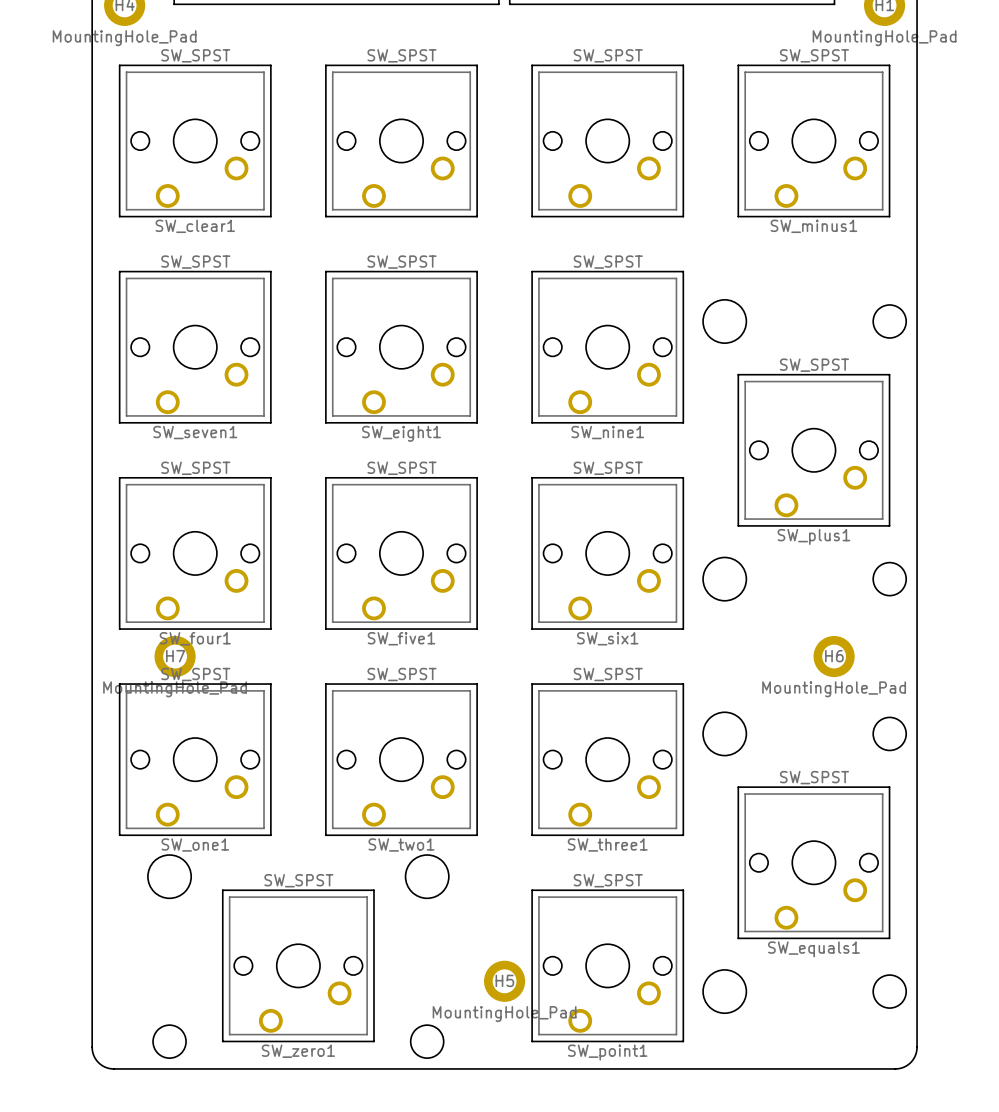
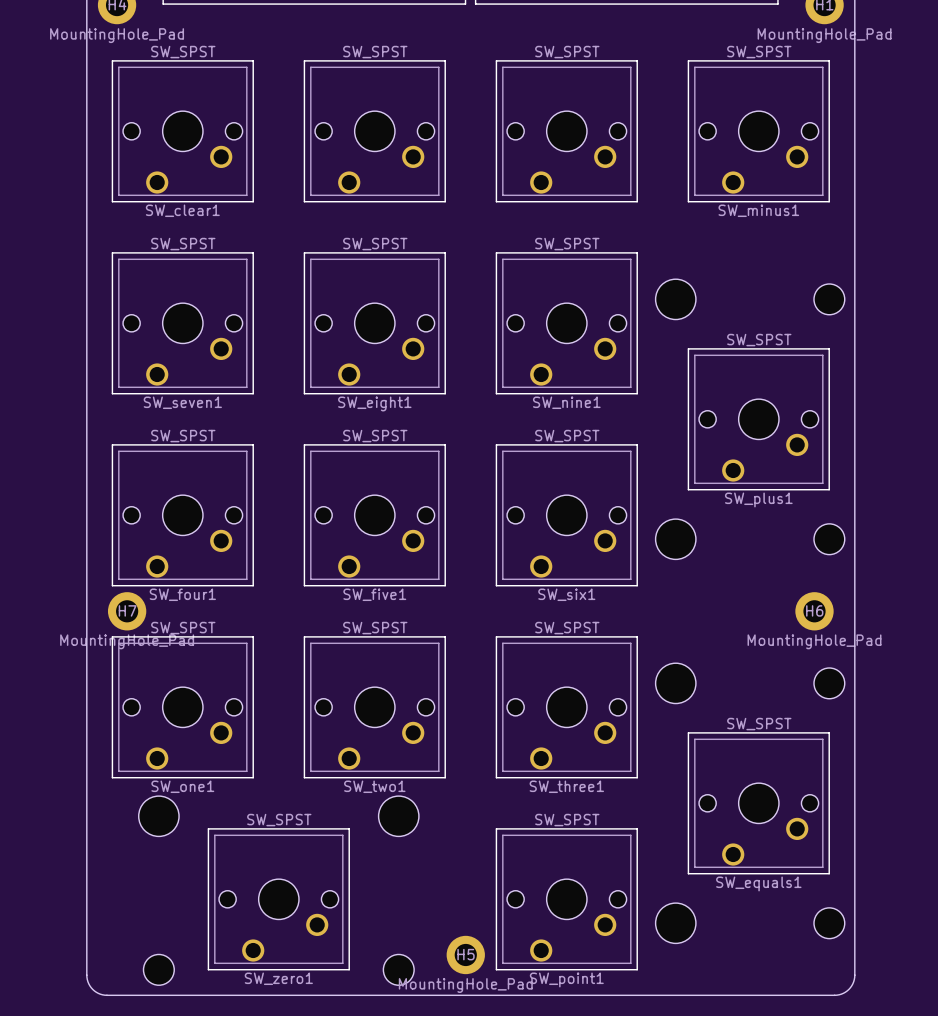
H7 position: (175, 656) -> (127, 611)
H6 position: (834, 656) -> (814, 611)
H5 position: (504, 981) -> (465, 954)

